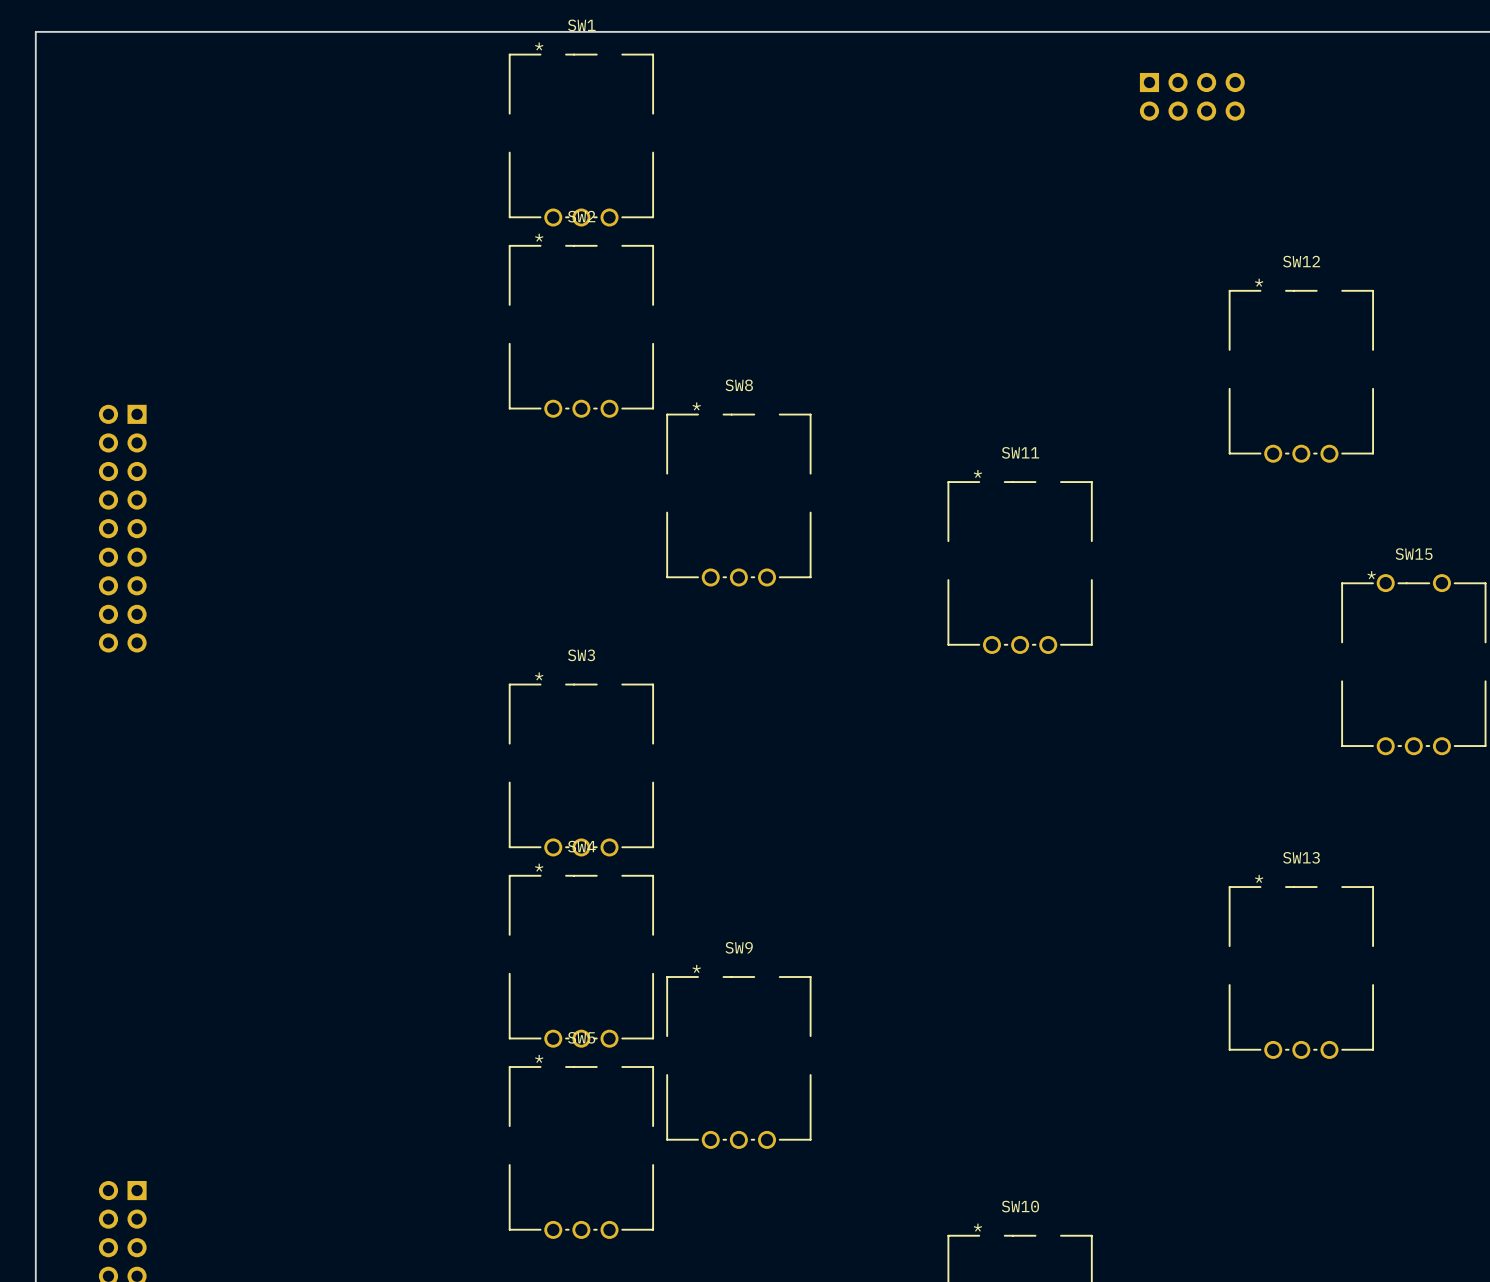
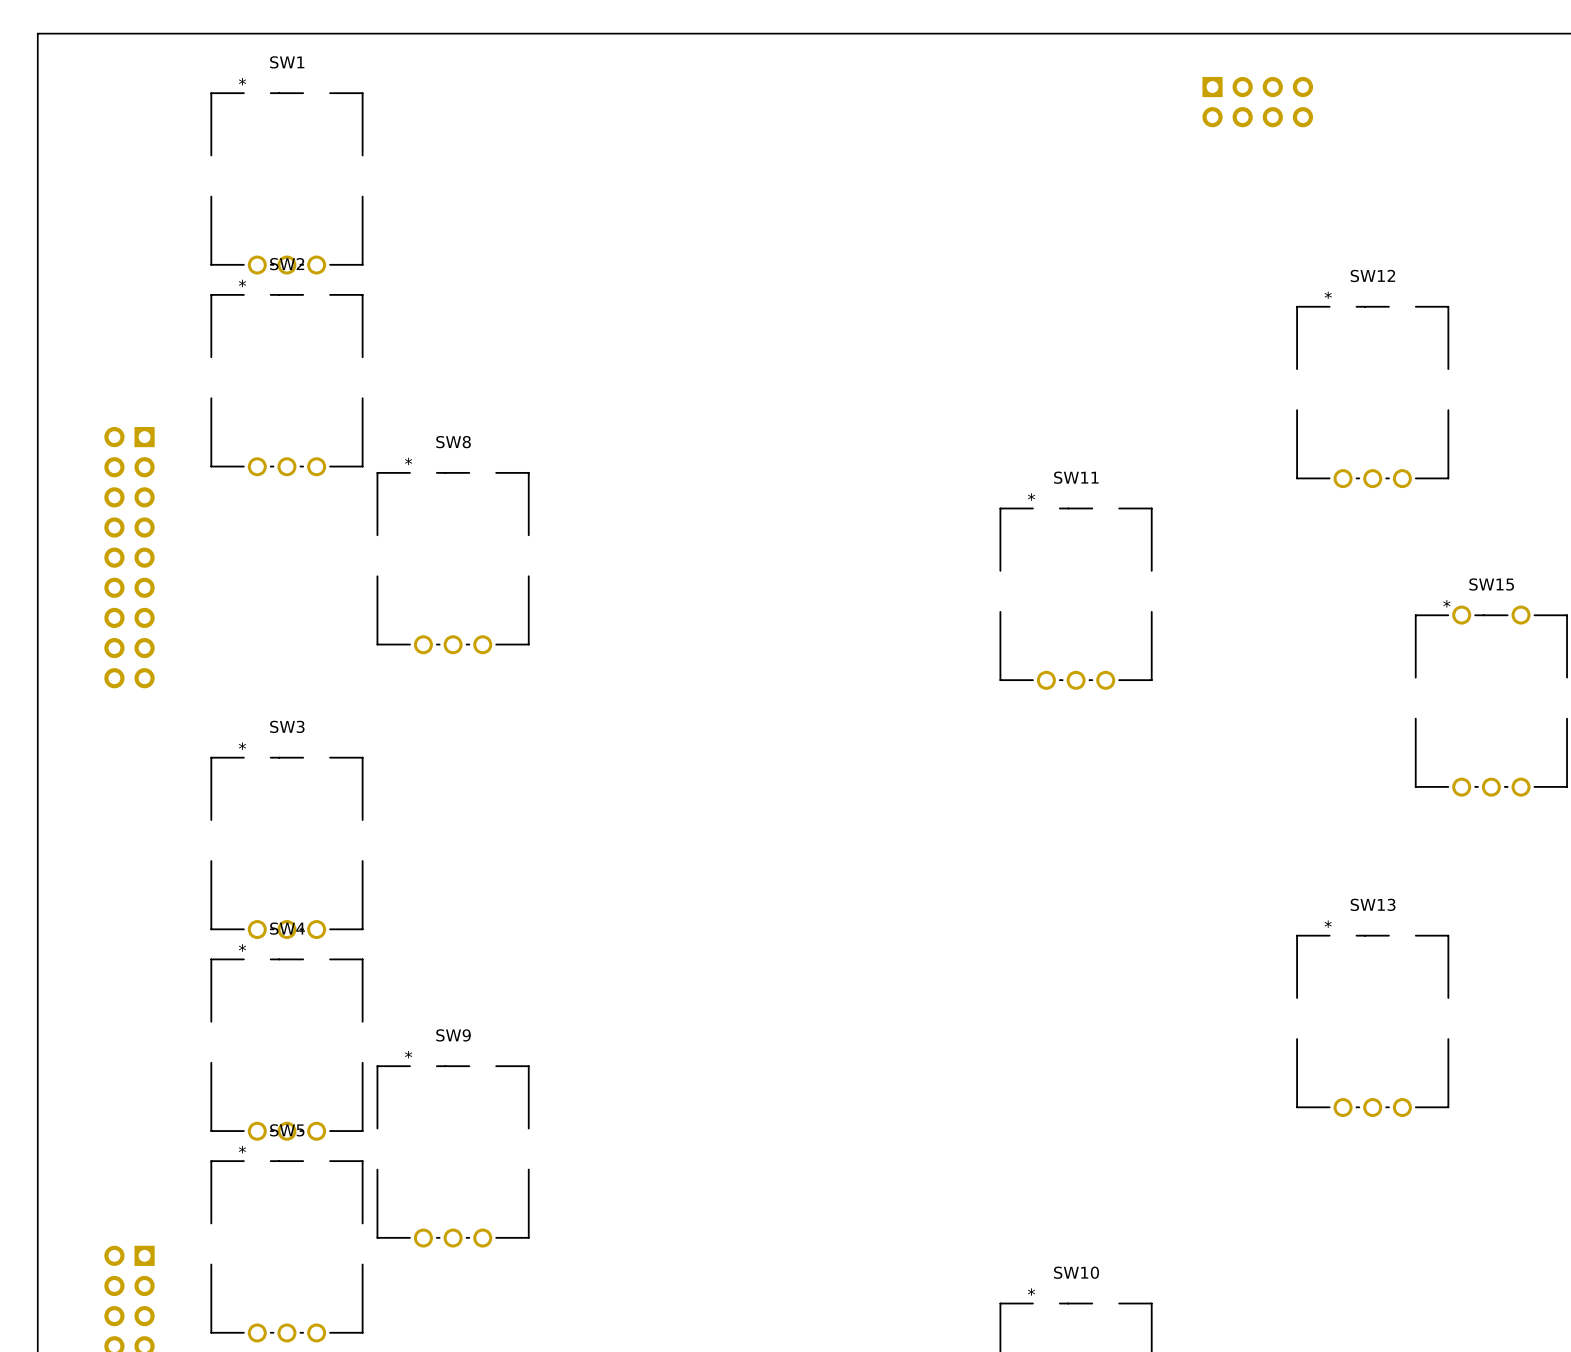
SW1 position: (581, 140) -> (286, 183)
SW2 position: (581, 331) -> (286, 385)
SW8 position: (738, 500) -> (453, 563)
SW3 position: (581, 770) -> (286, 847)
SW4 position: (581, 961) -> (286, 1049)
SW9 position: (738, 1062) -> (453, 1156)
SW5 position: (581, 1152) -> (286, 1251)

